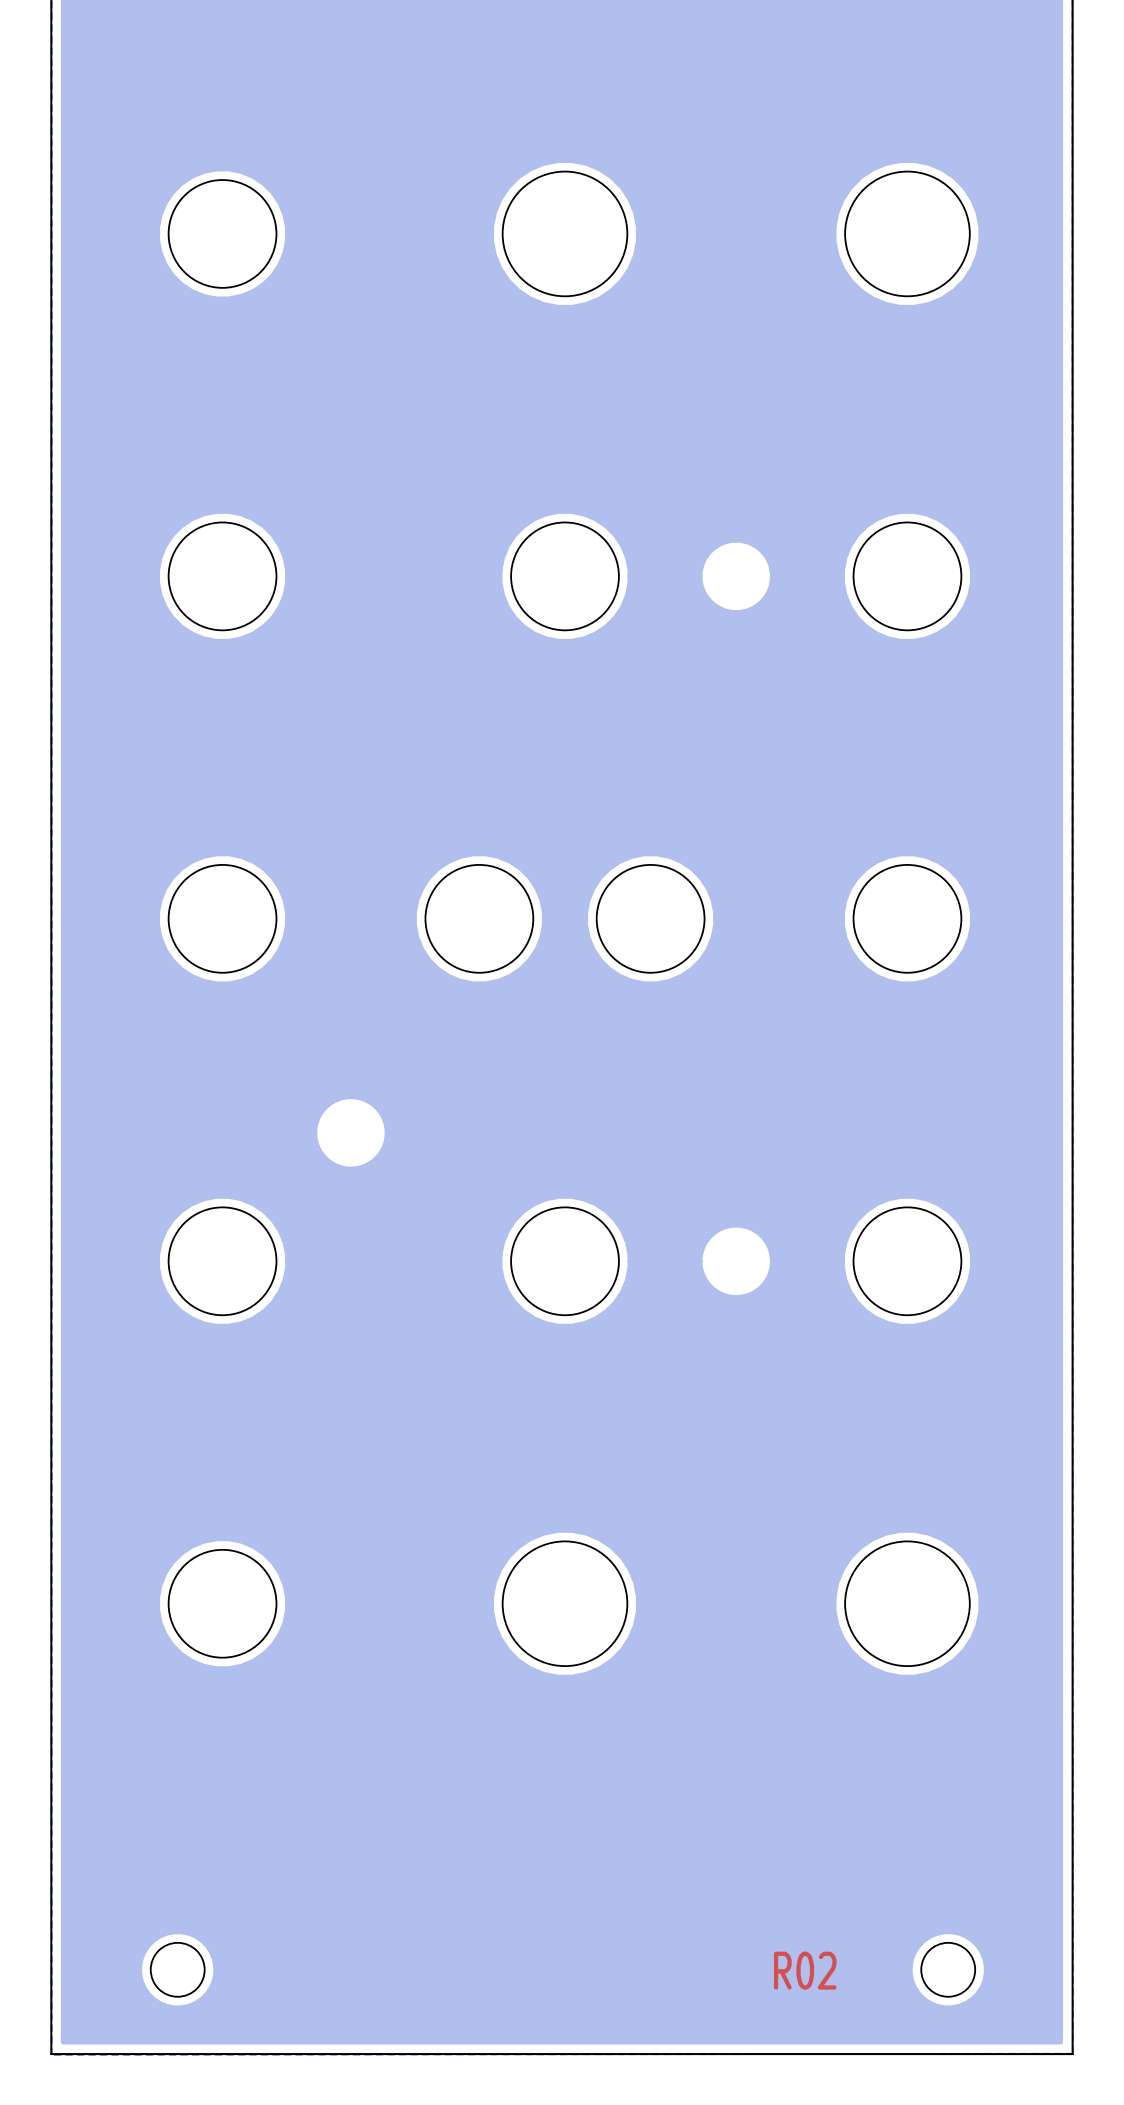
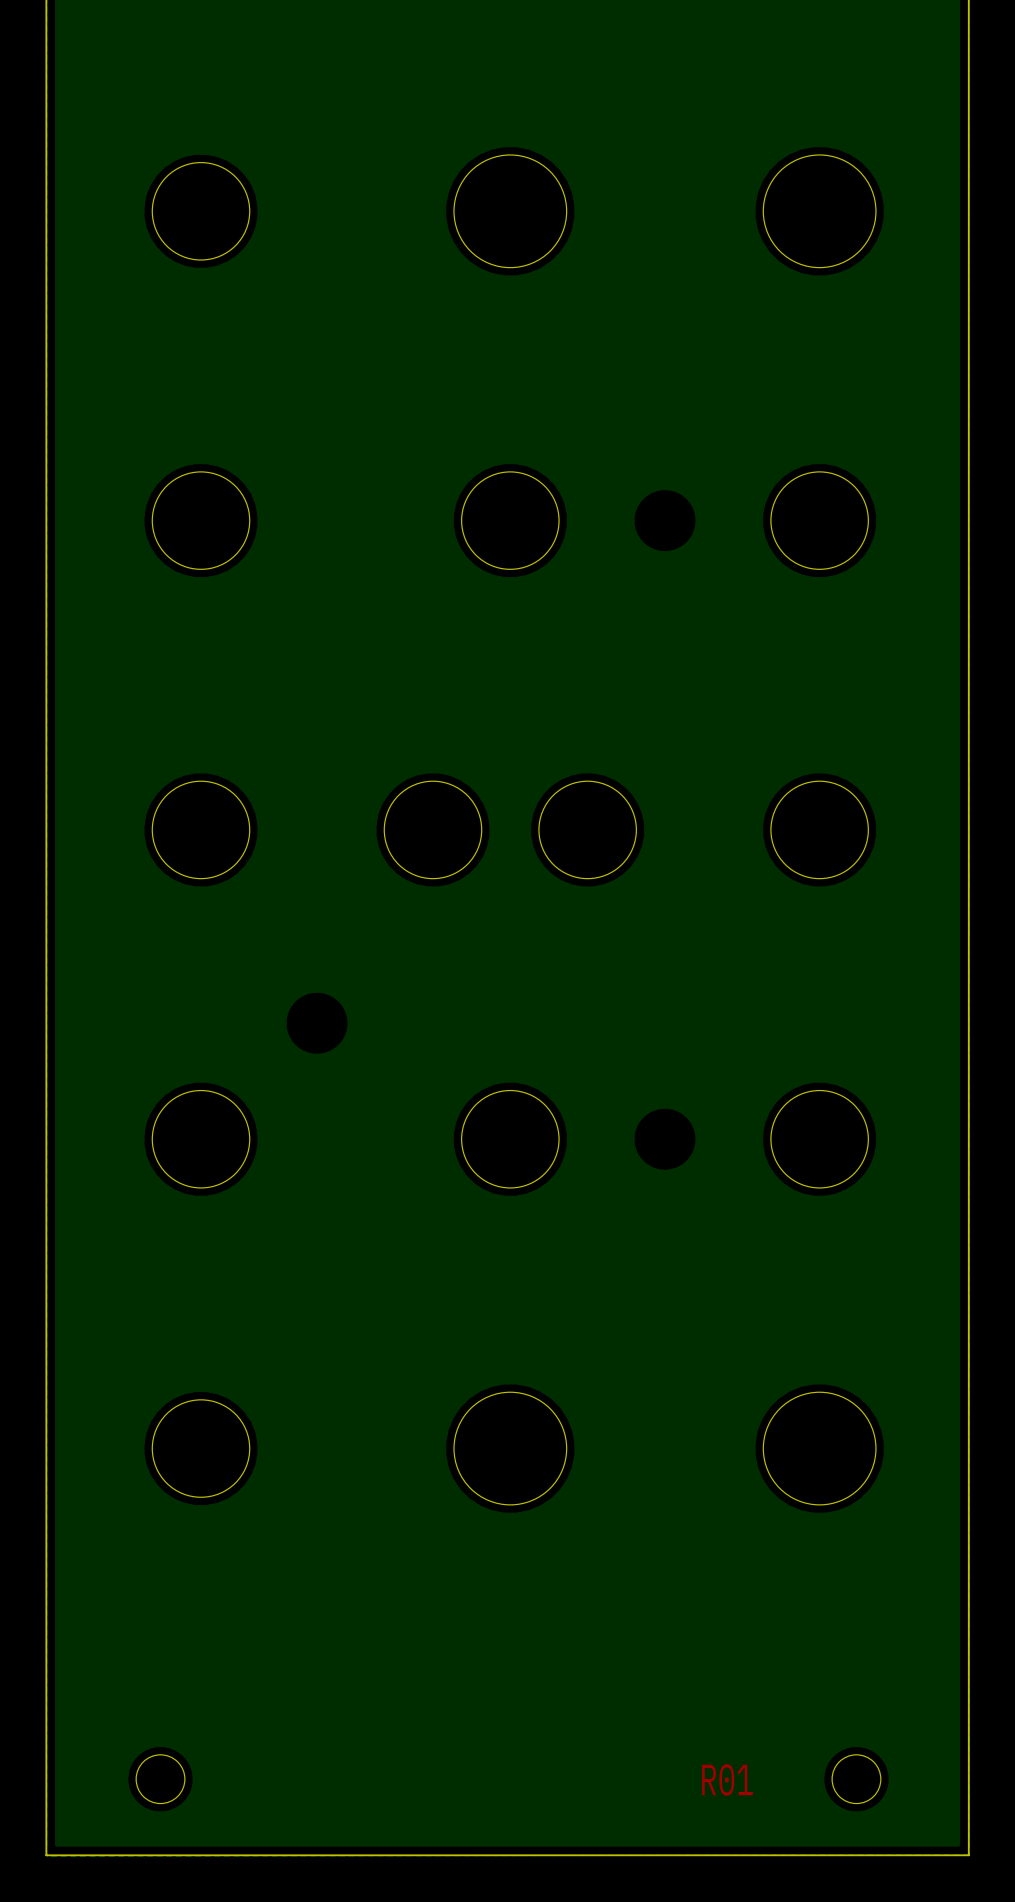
text: R02 (805, 1970) -> R01 (727, 1779)

